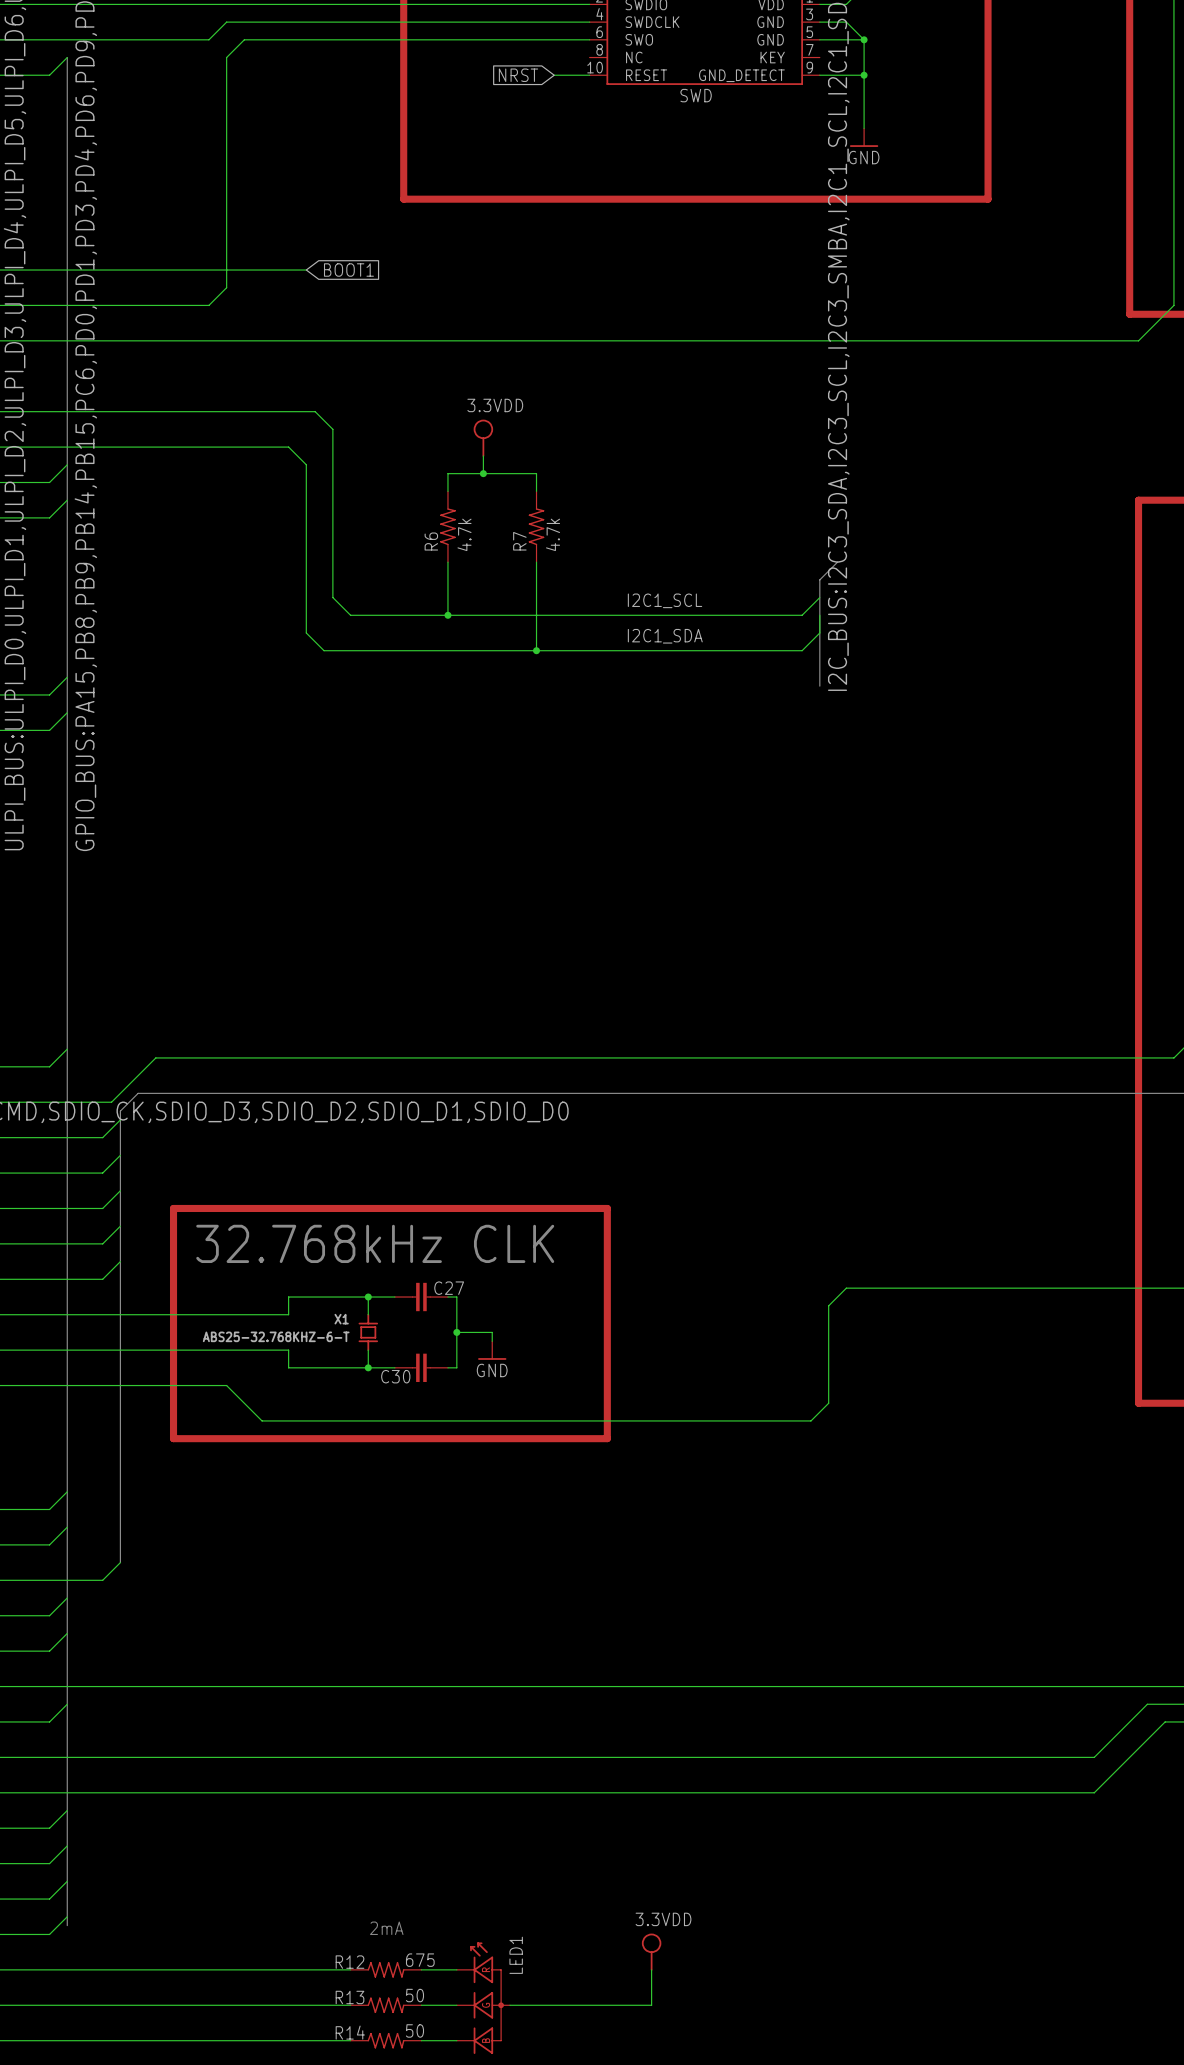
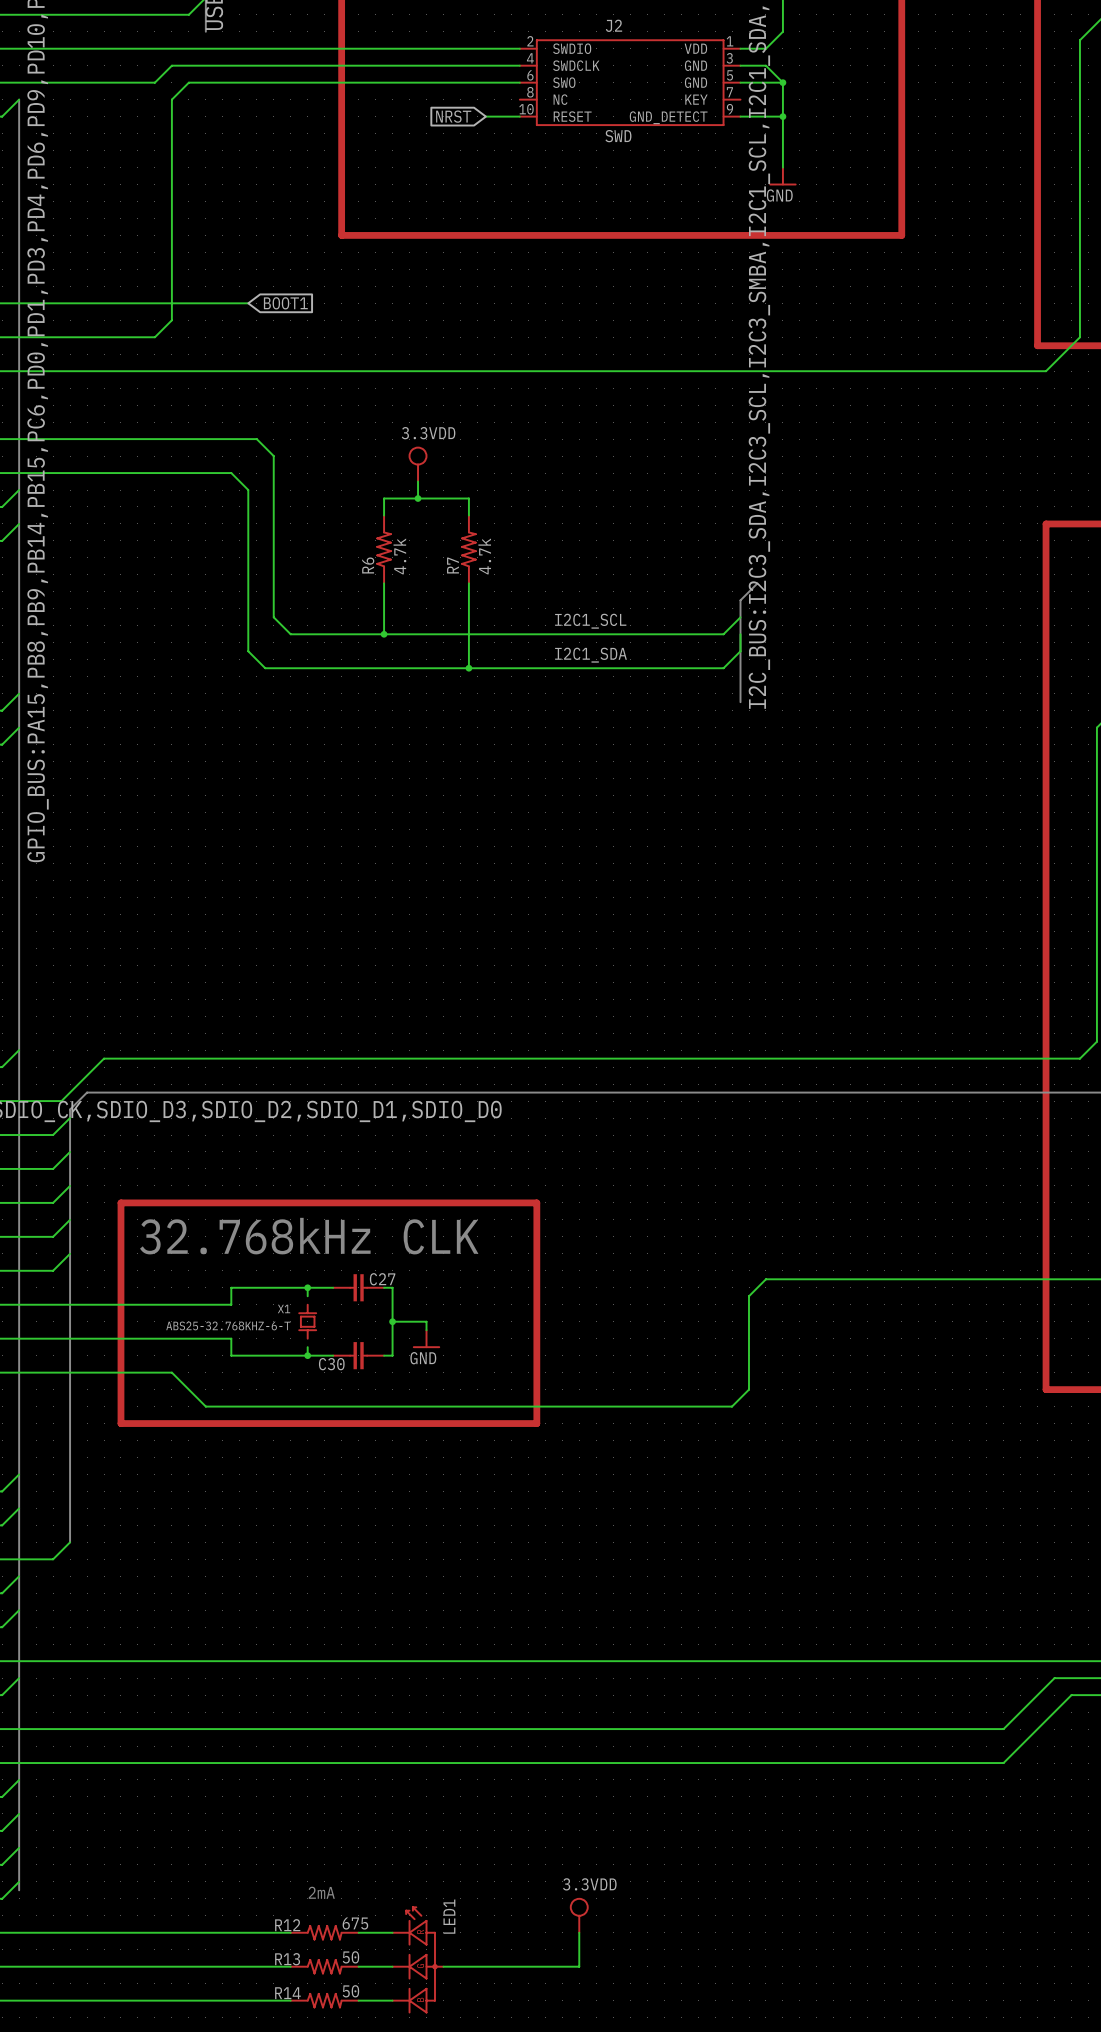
wire: (368, 1305) (368, 1314) -> none
wire: (368, 1350) (368, 1358) -> none

